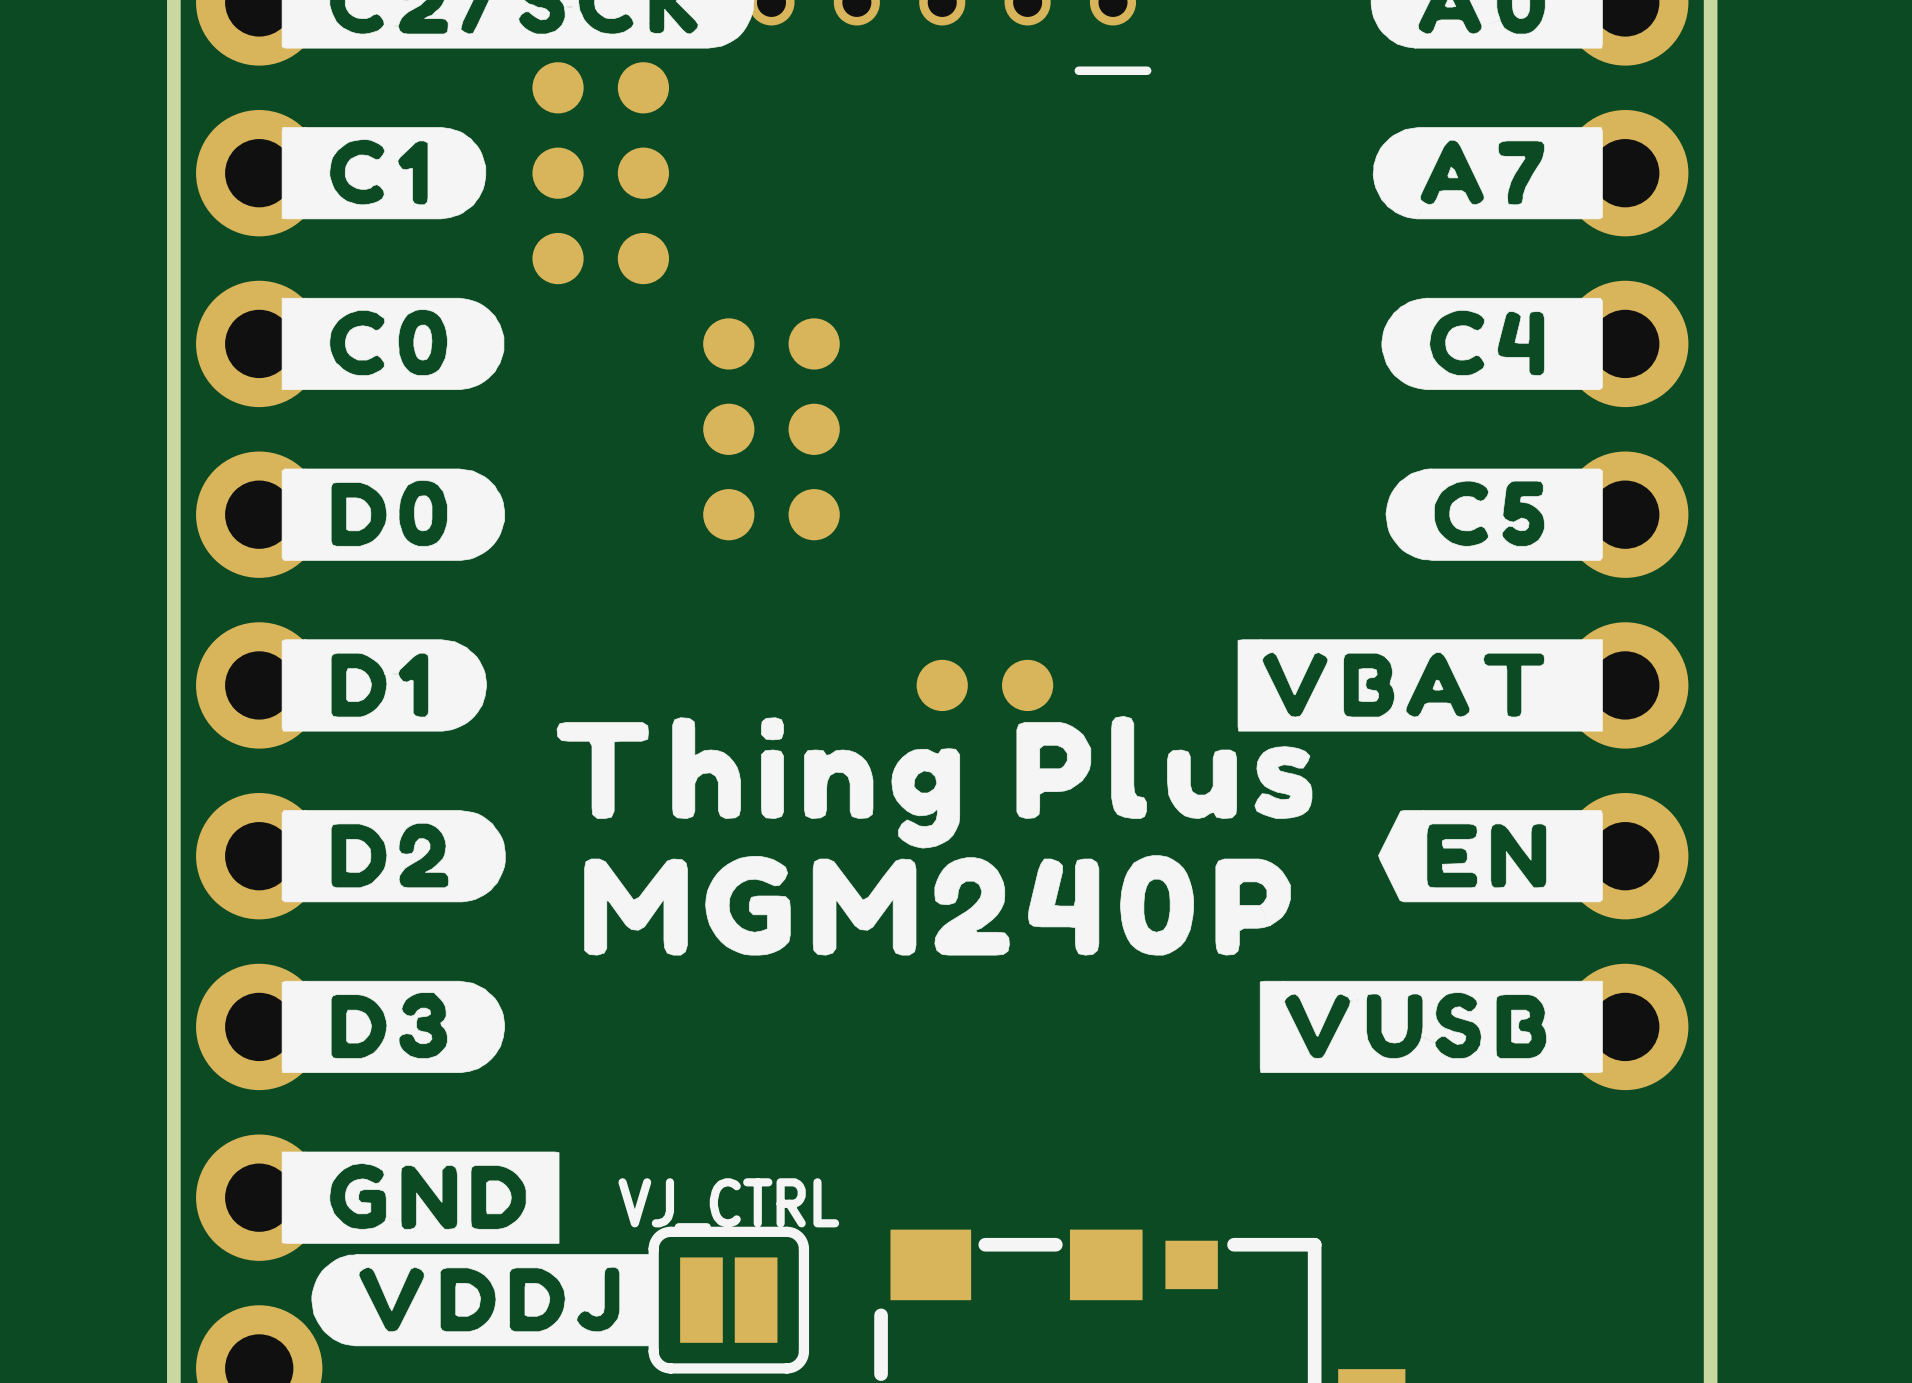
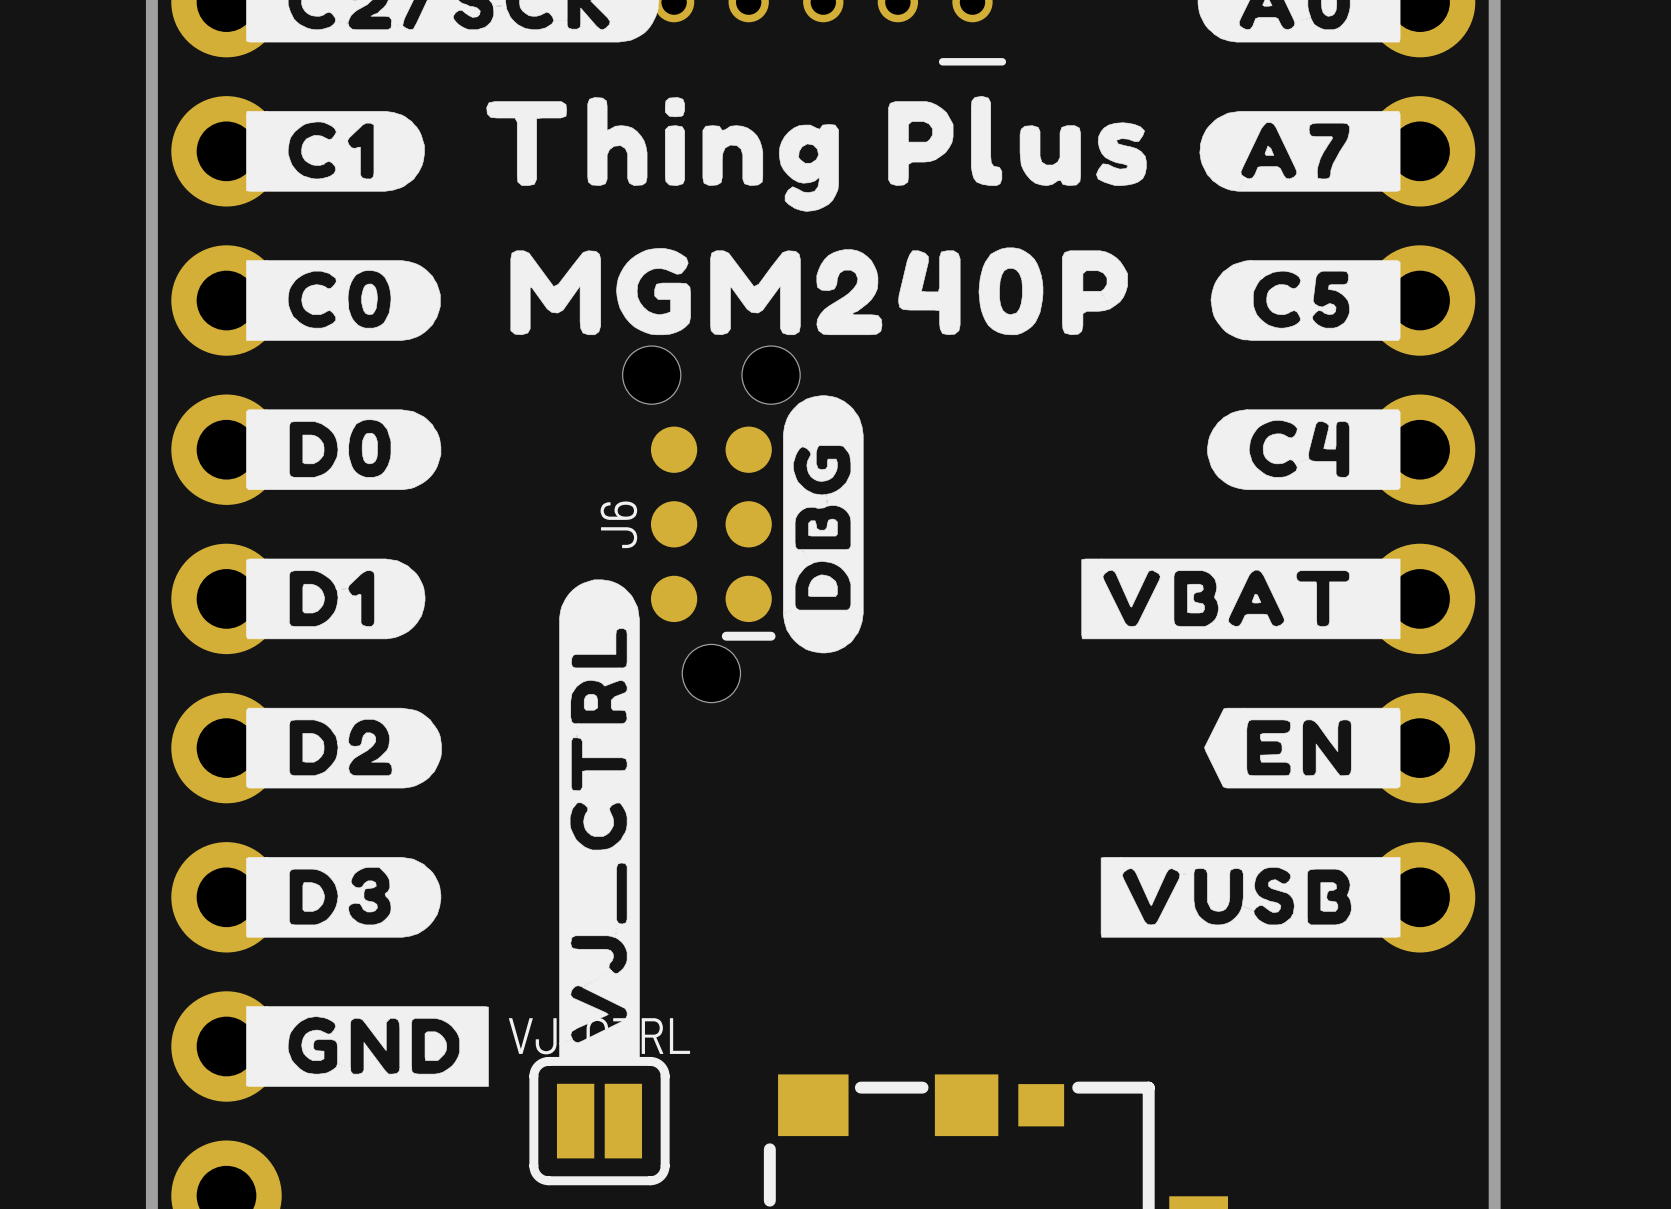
part: (558, 87) -> none
part: (643, 87) -> none
part: (558, 173) -> none
part: (643, 173) -> none
part: (558, 258) -> none
part: (643, 258) -> none
part: (728, 343) -> none
part: (814, 343) -> none
drawing position: (1492, 343) -> (1303, 449)
part: (728, 429) -> none
part: (814, 429) -> none
drawing: none -> [783, 395, 864, 654]
part: (728, 514) -> none
part: (814, 514) -> none
drawing position: (1494, 514) -> (1305, 300)
J6: none -> (711, 524)
drawing: none -> [559, 579, 640, 1065]
part: (942, 685) -> none
part: (1027, 685) -> none
drawing position: (934, 782) -> (816, 153)
drawing position: (937, 905) -> (819, 291)
drawing: [311, 1254, 656, 1347] -> none
VJ_CTRL position: (728, 1300) -> (599, 1121)

